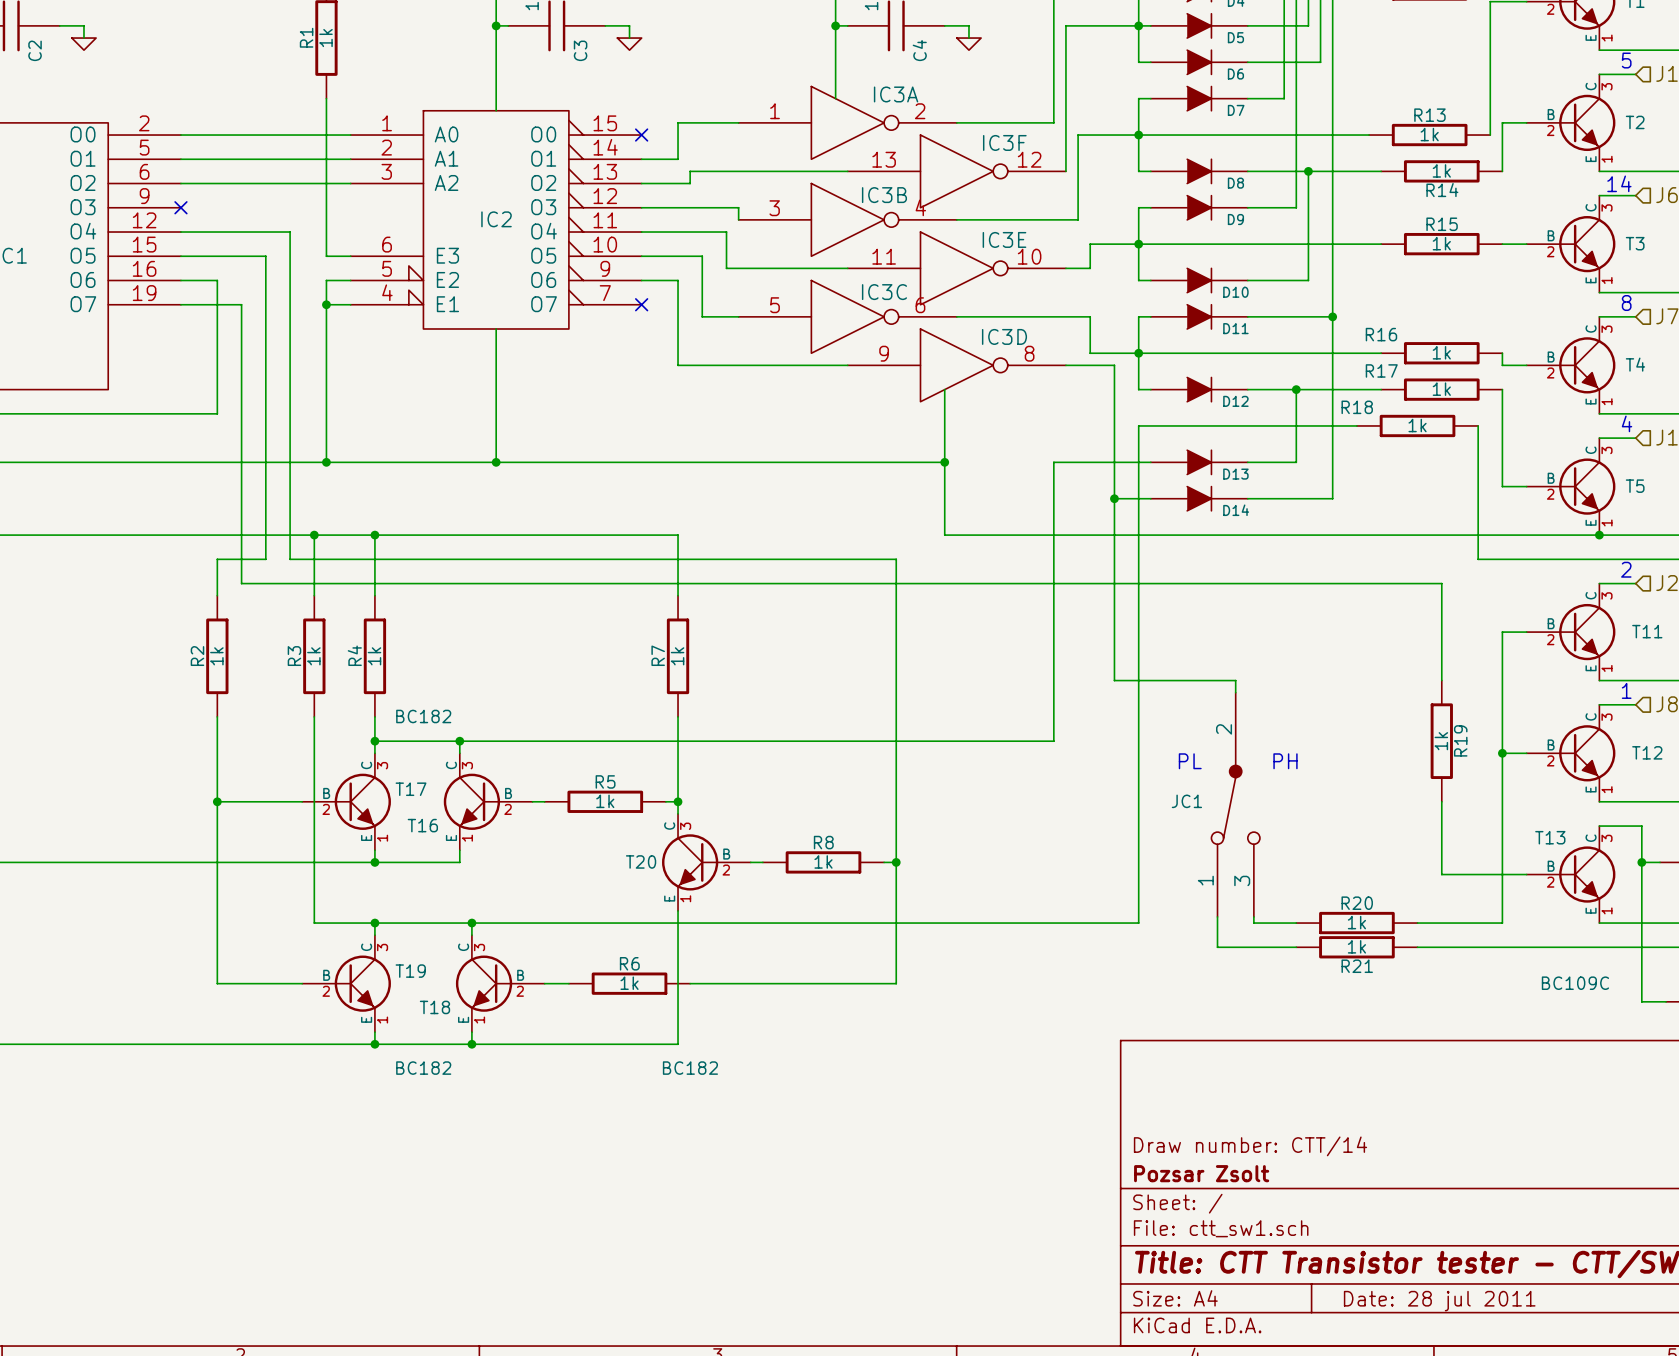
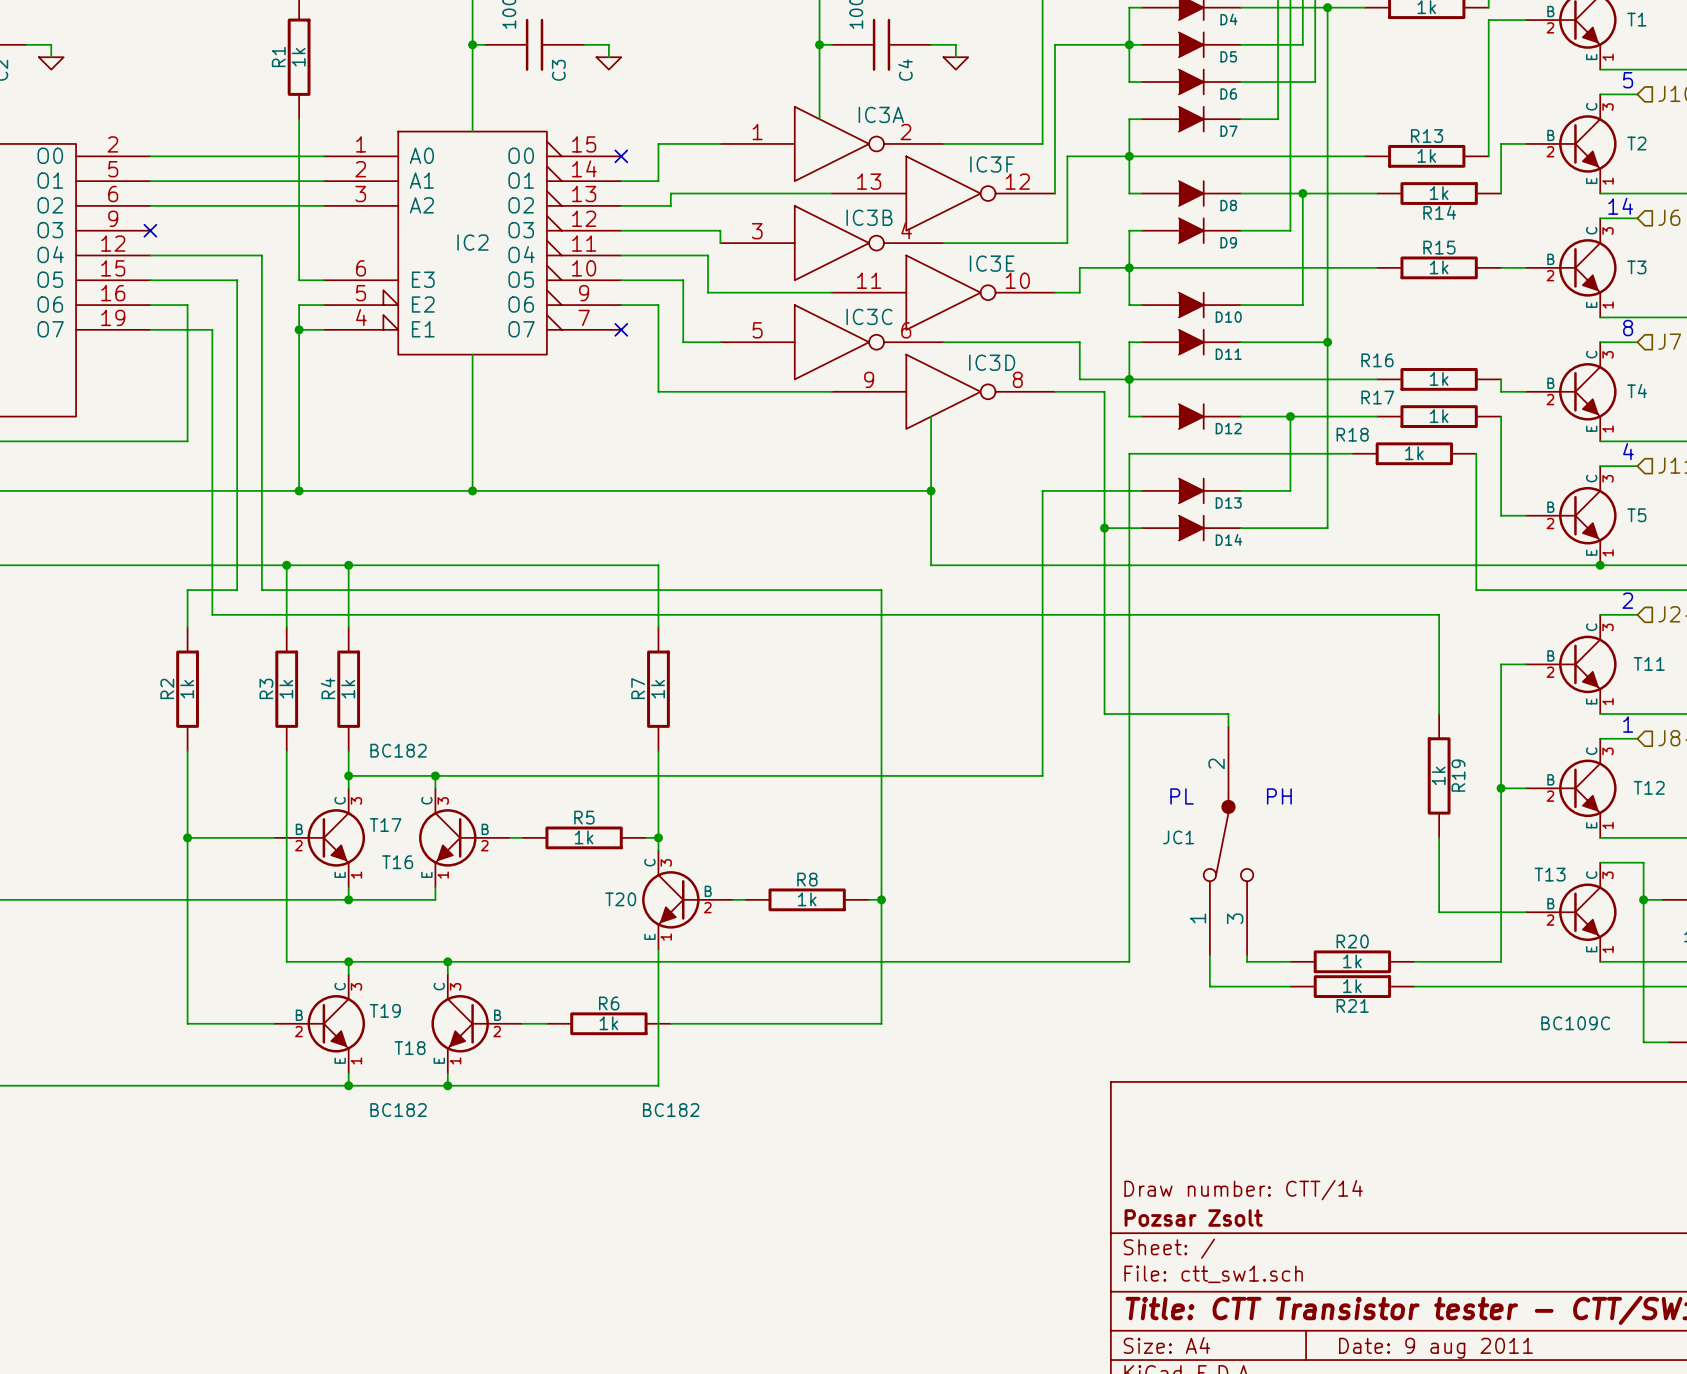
title block: Date: 28 jul 2011 (1439, 1301) -> Date: 9 aug 2011 (1435, 1348)

